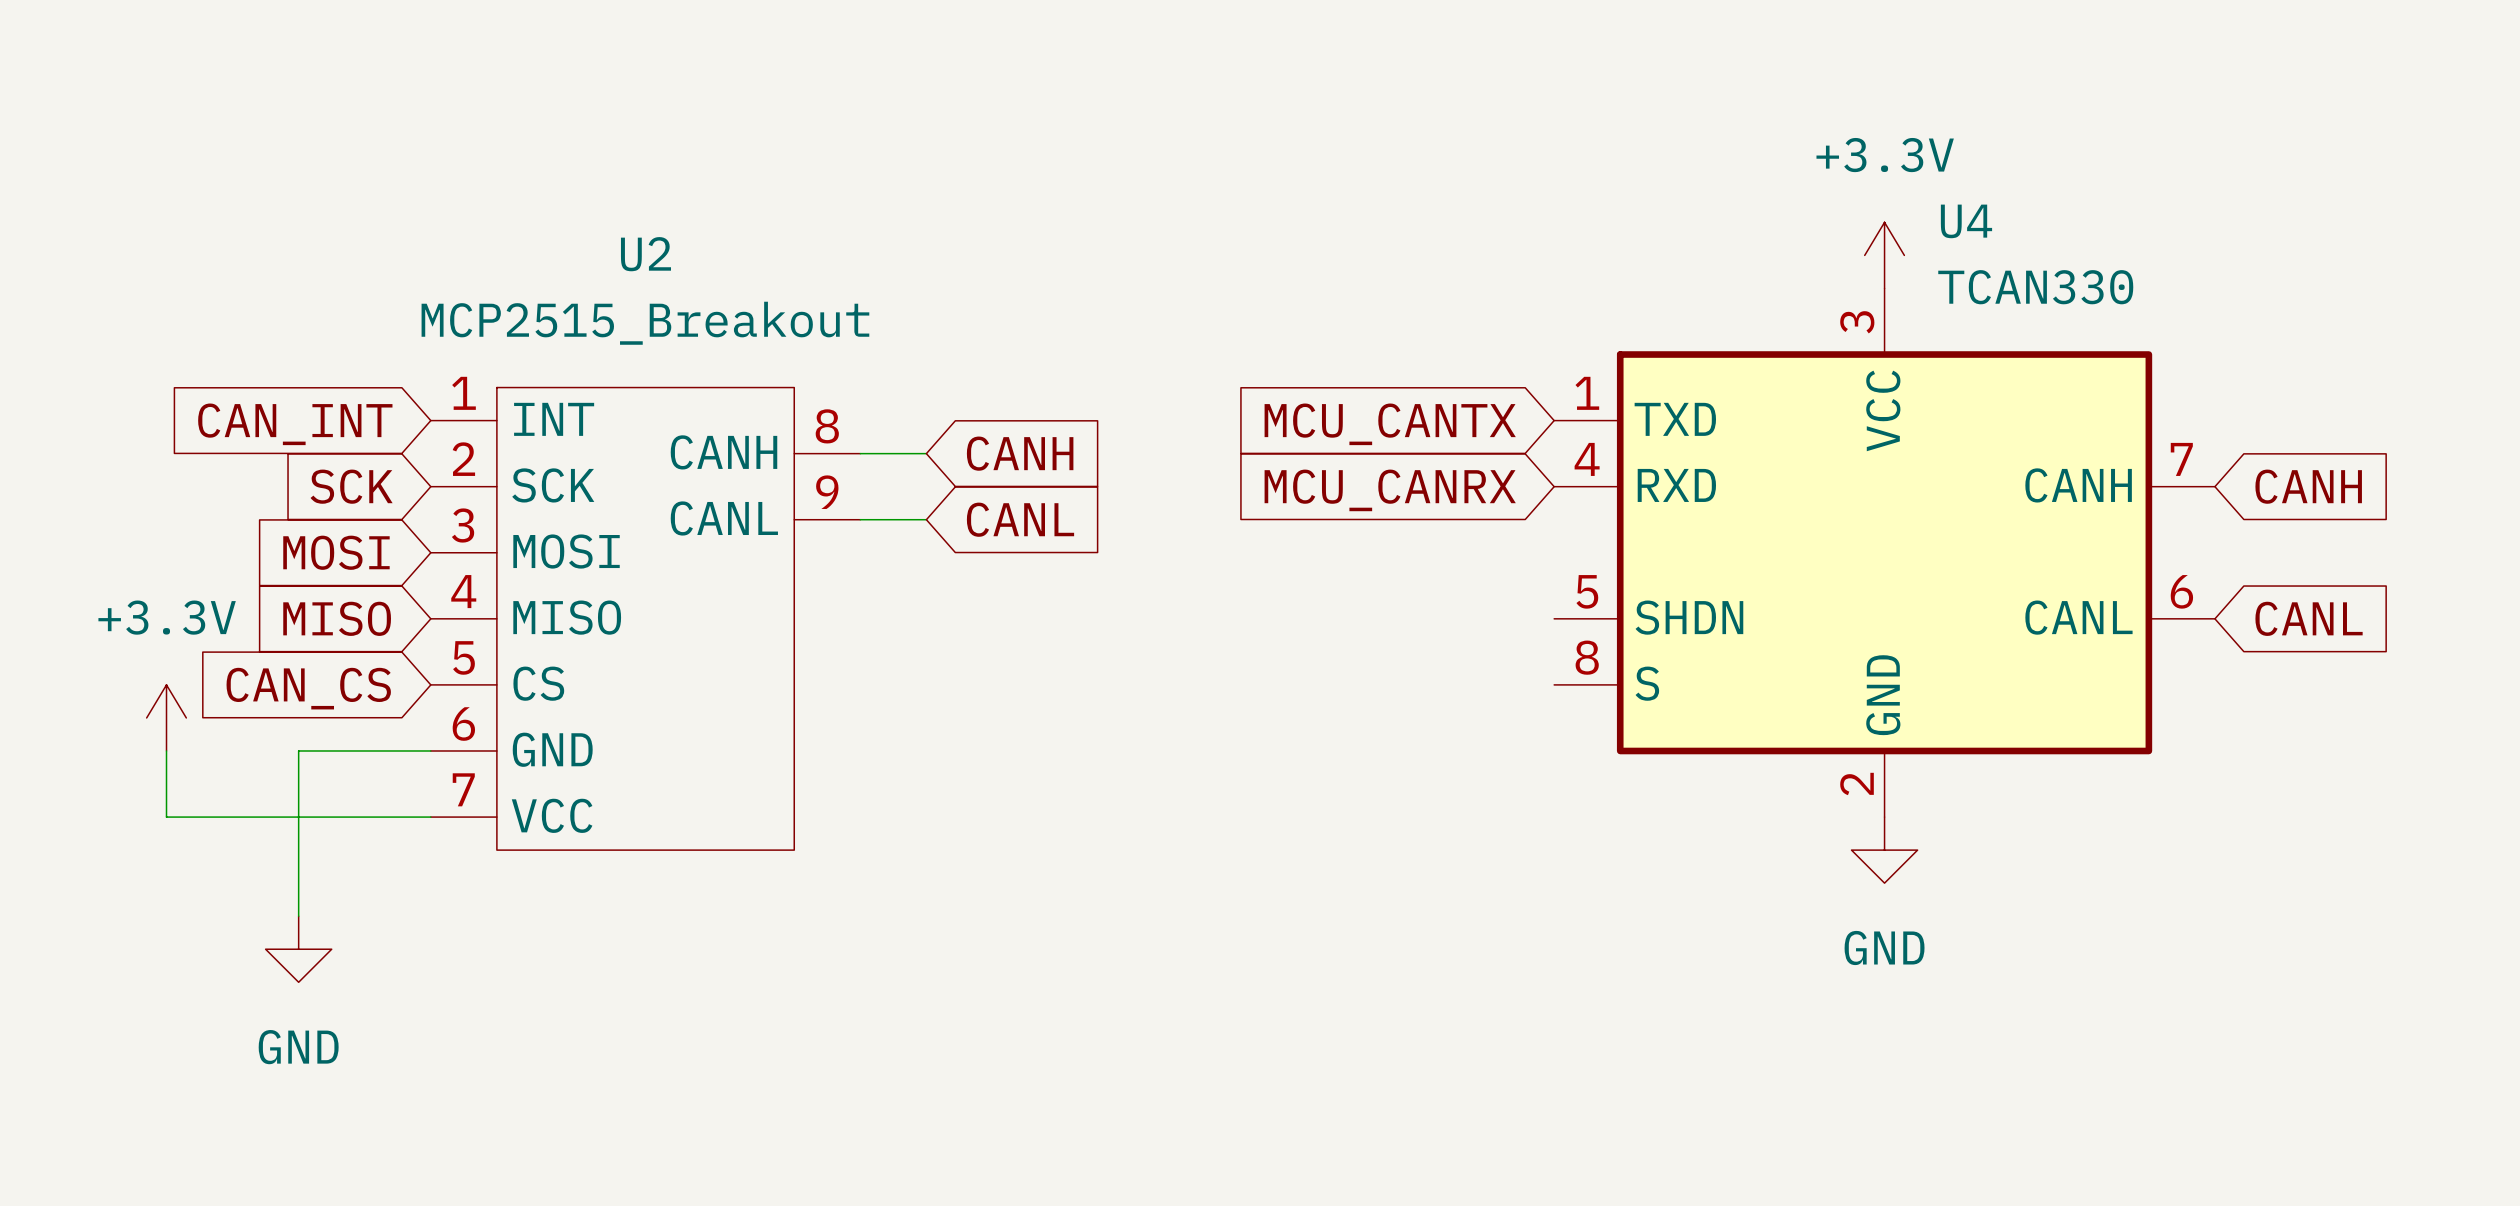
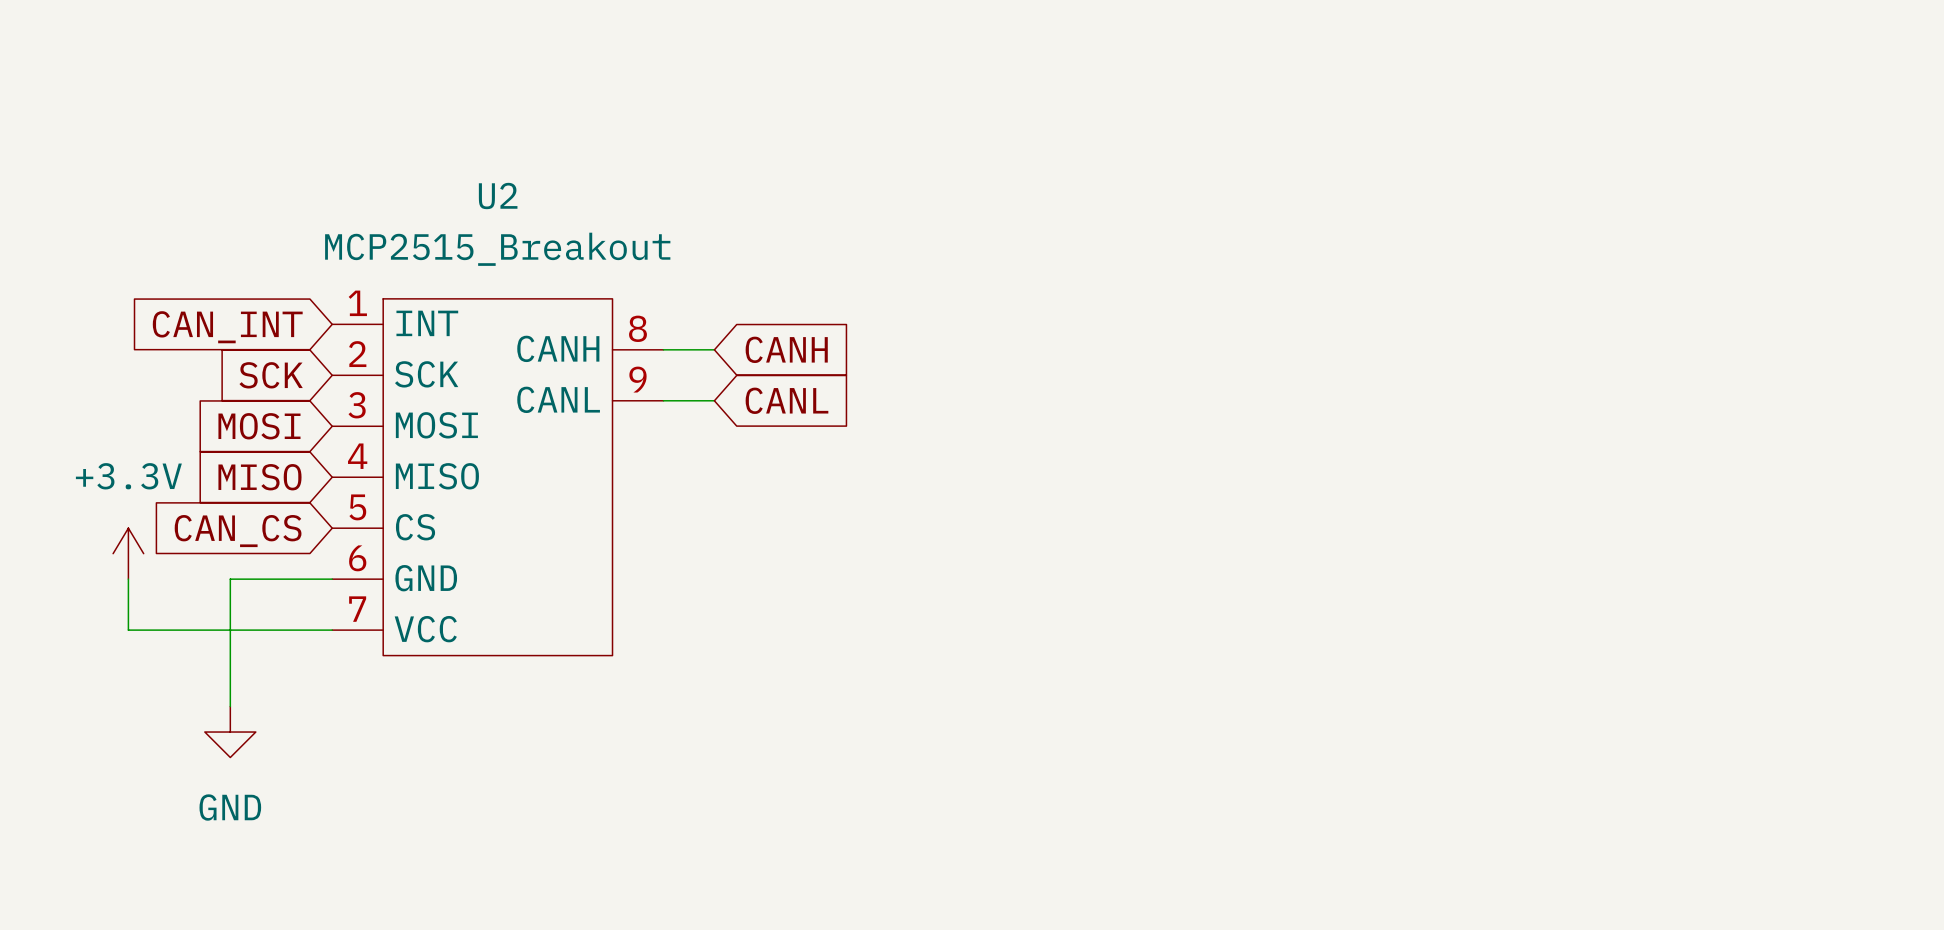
power symbol: +3.3V (1884, 255) -> none
global label: MCU_CANTX (1390, 424) -> none
global label: CANH (2308, 486) -> none
global label: MCU_CANRX (1390, 490) -> none
U4: TCAN330 (1884, 552) -> none
global label: CANL (2309, 618) -> none
power symbol: GND (1884, 850) -> none

